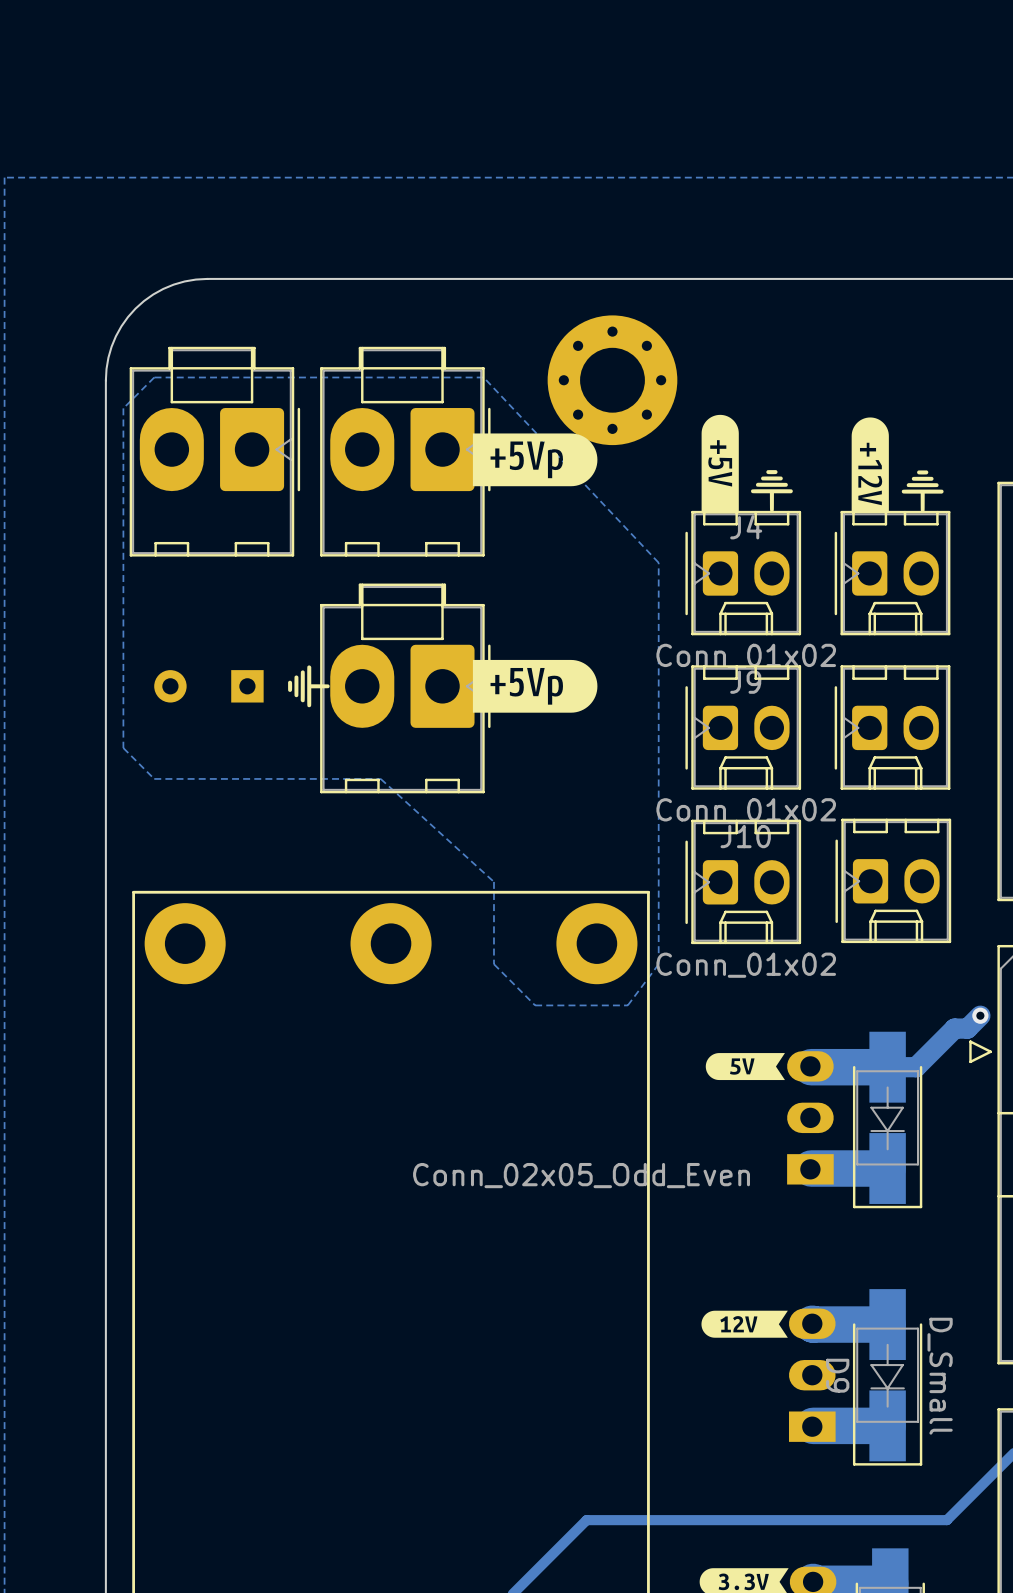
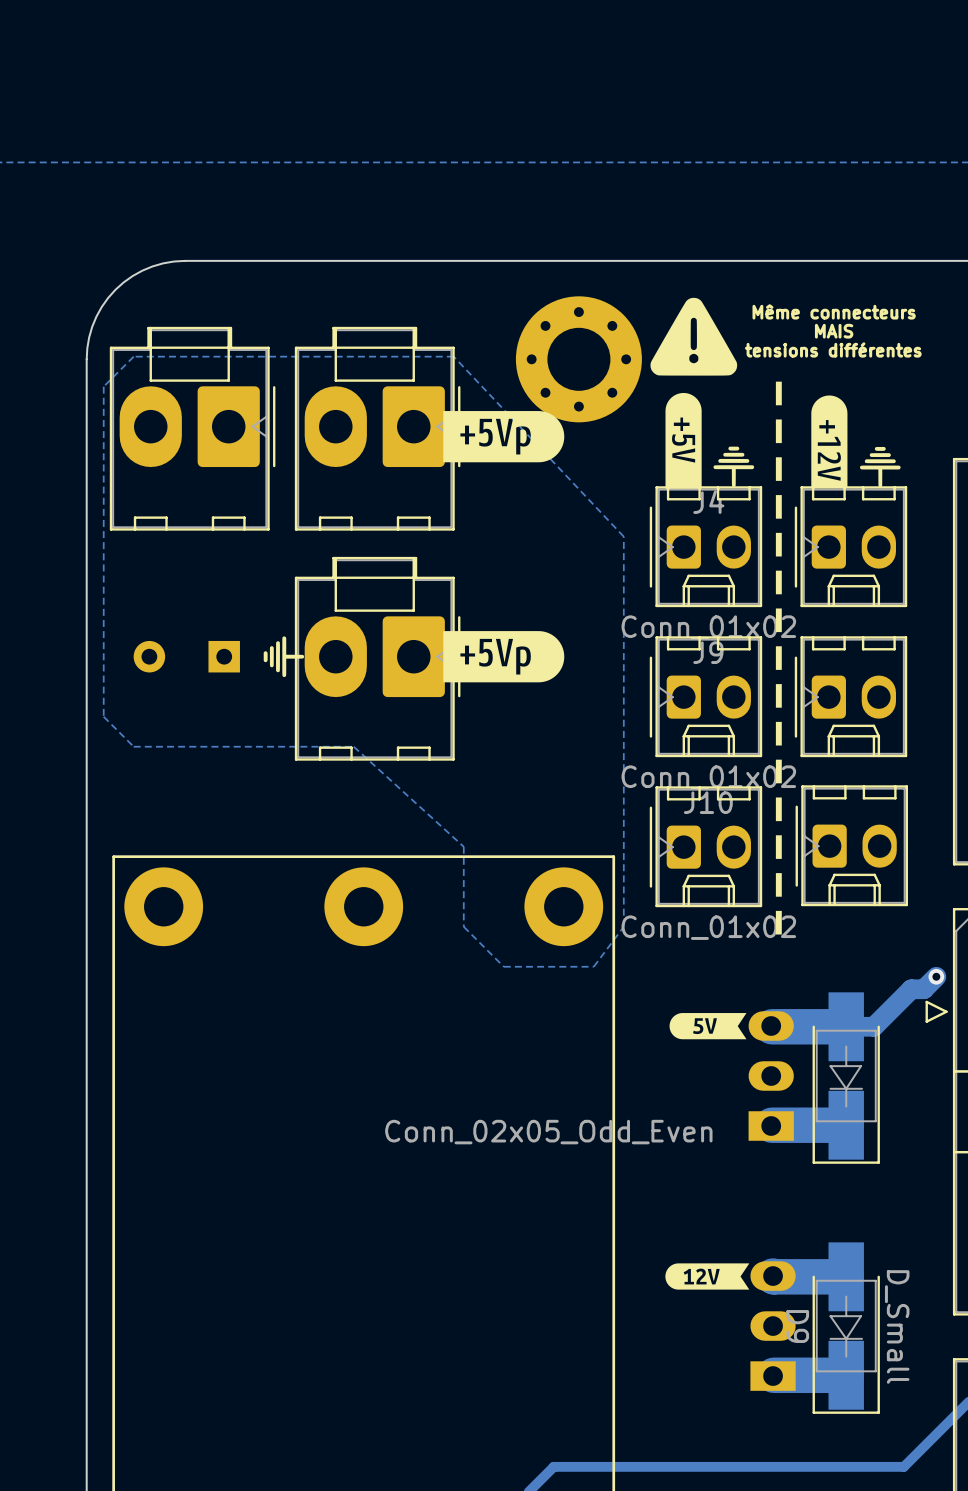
drawing: none -> [650, 297, 738, 376]
text: none -> Même connecteurs (834, 311)
text: none -> MAIS (834, 331)
text: none -> tensions différentes (833, 349)
line: none -> (778, 381) (778, 946)

